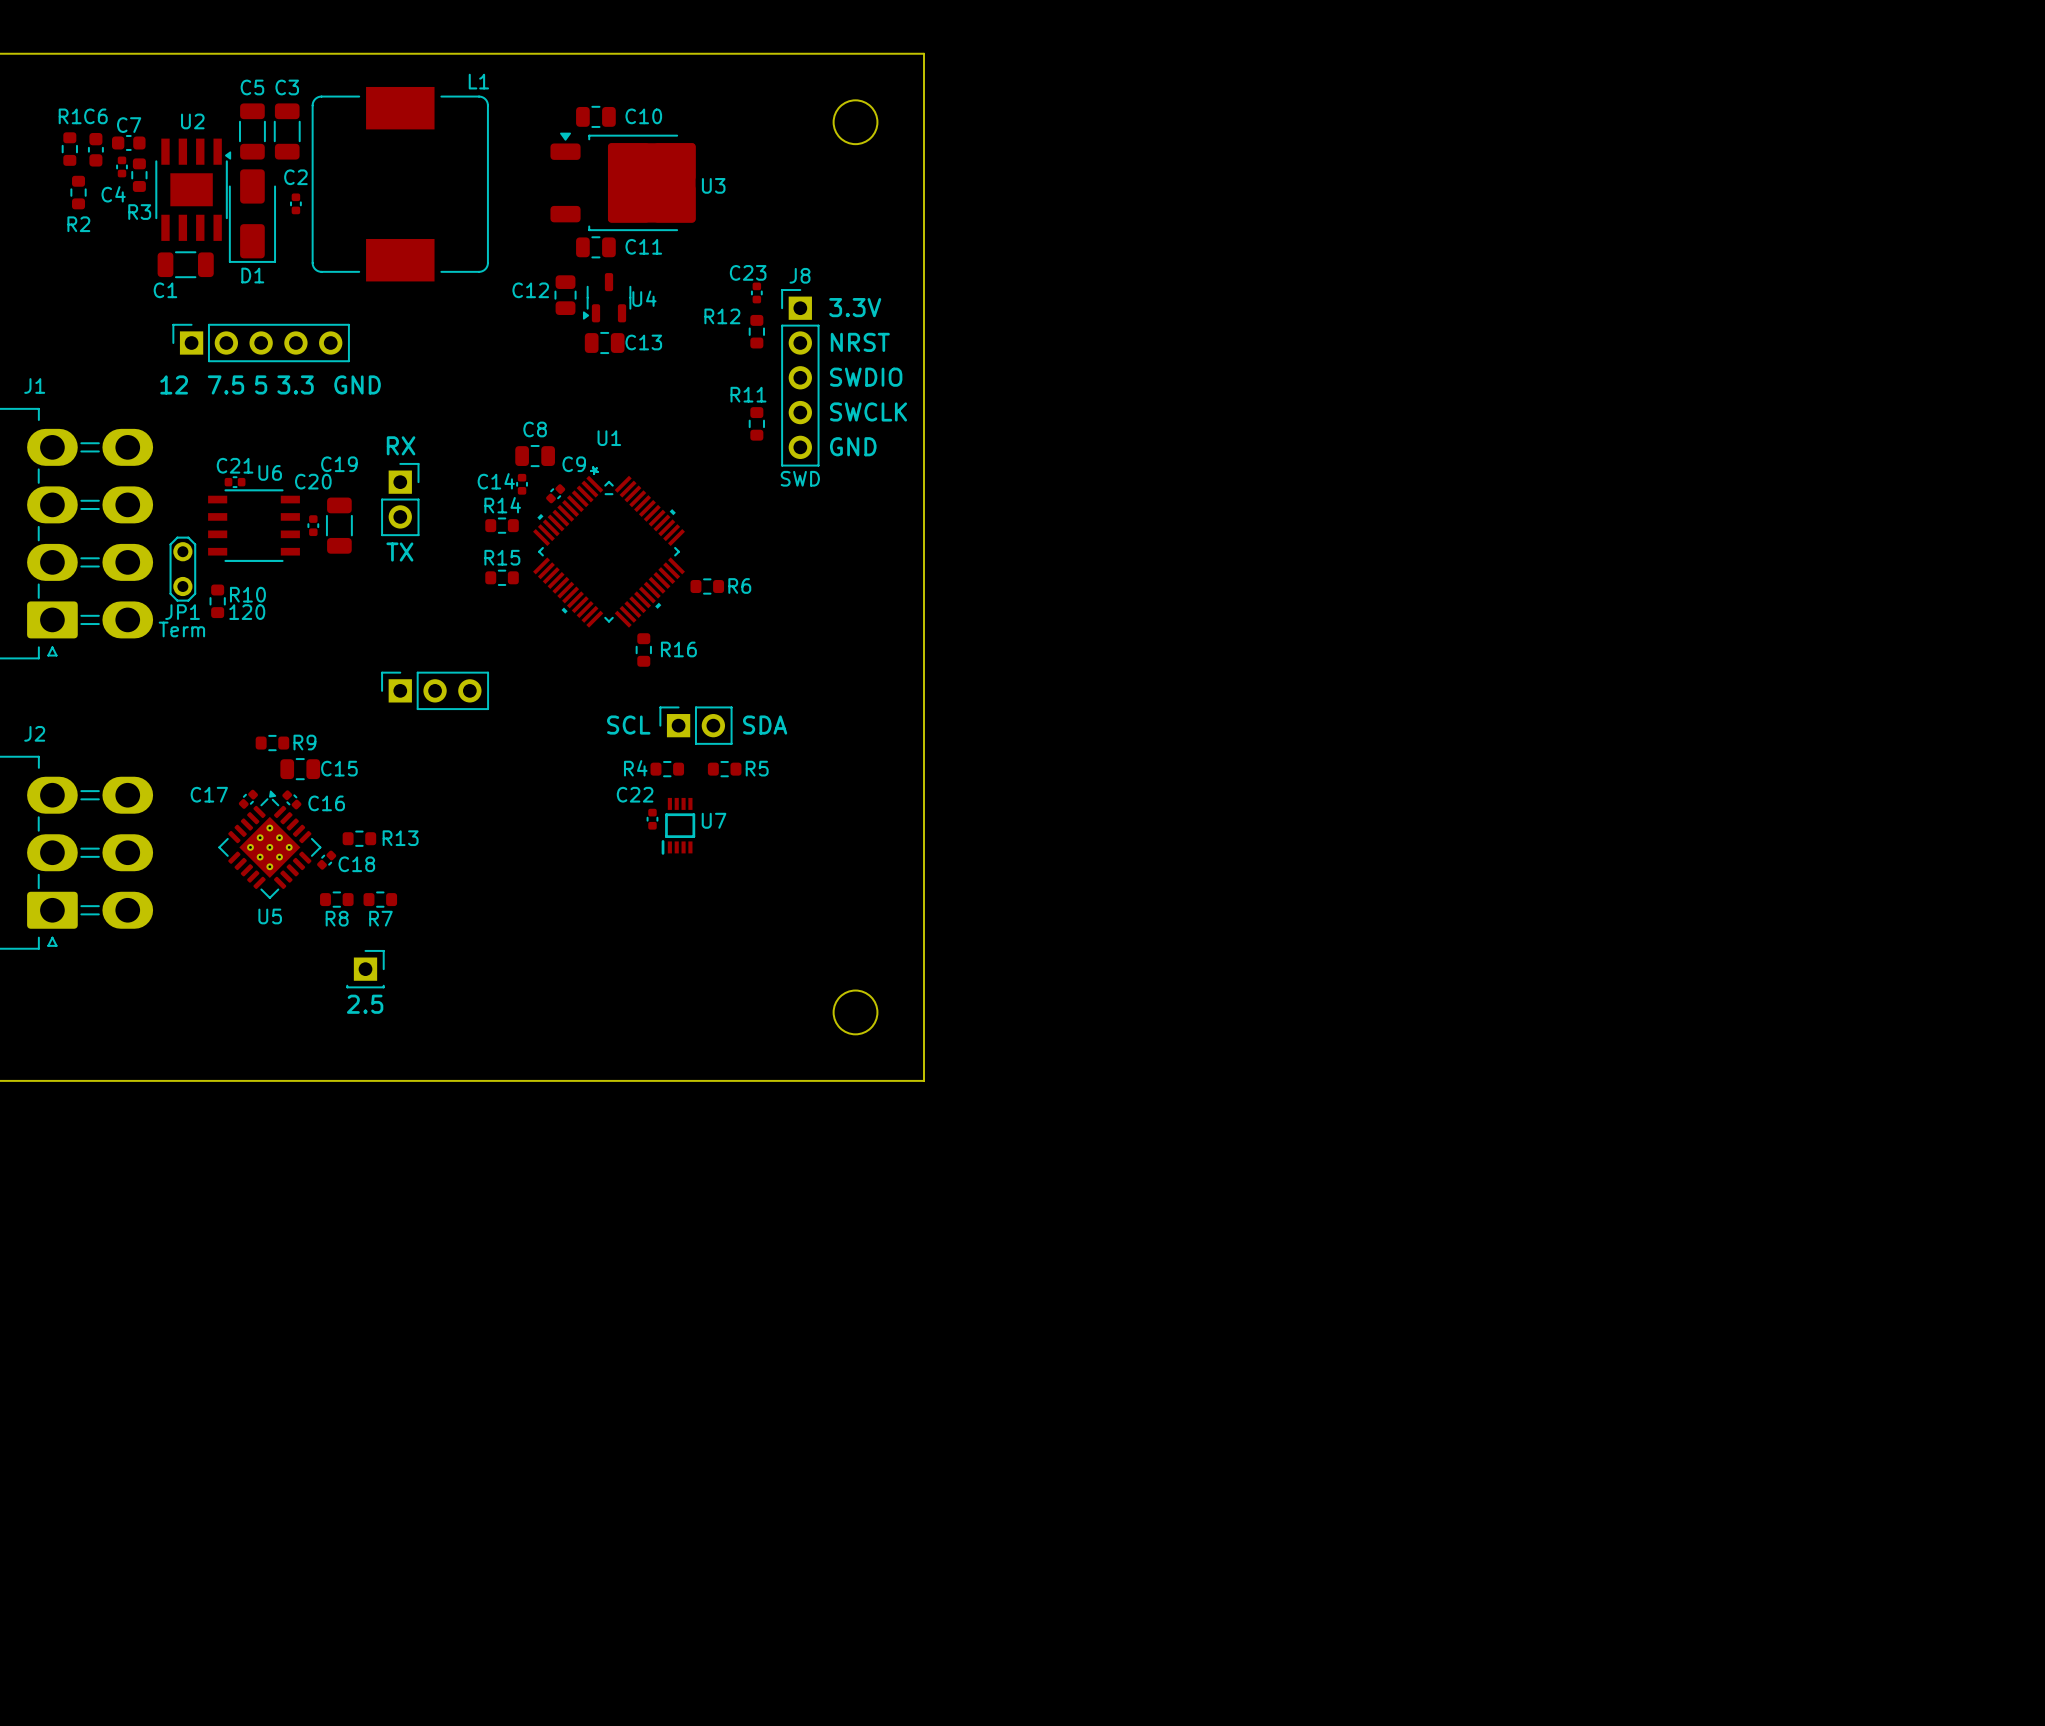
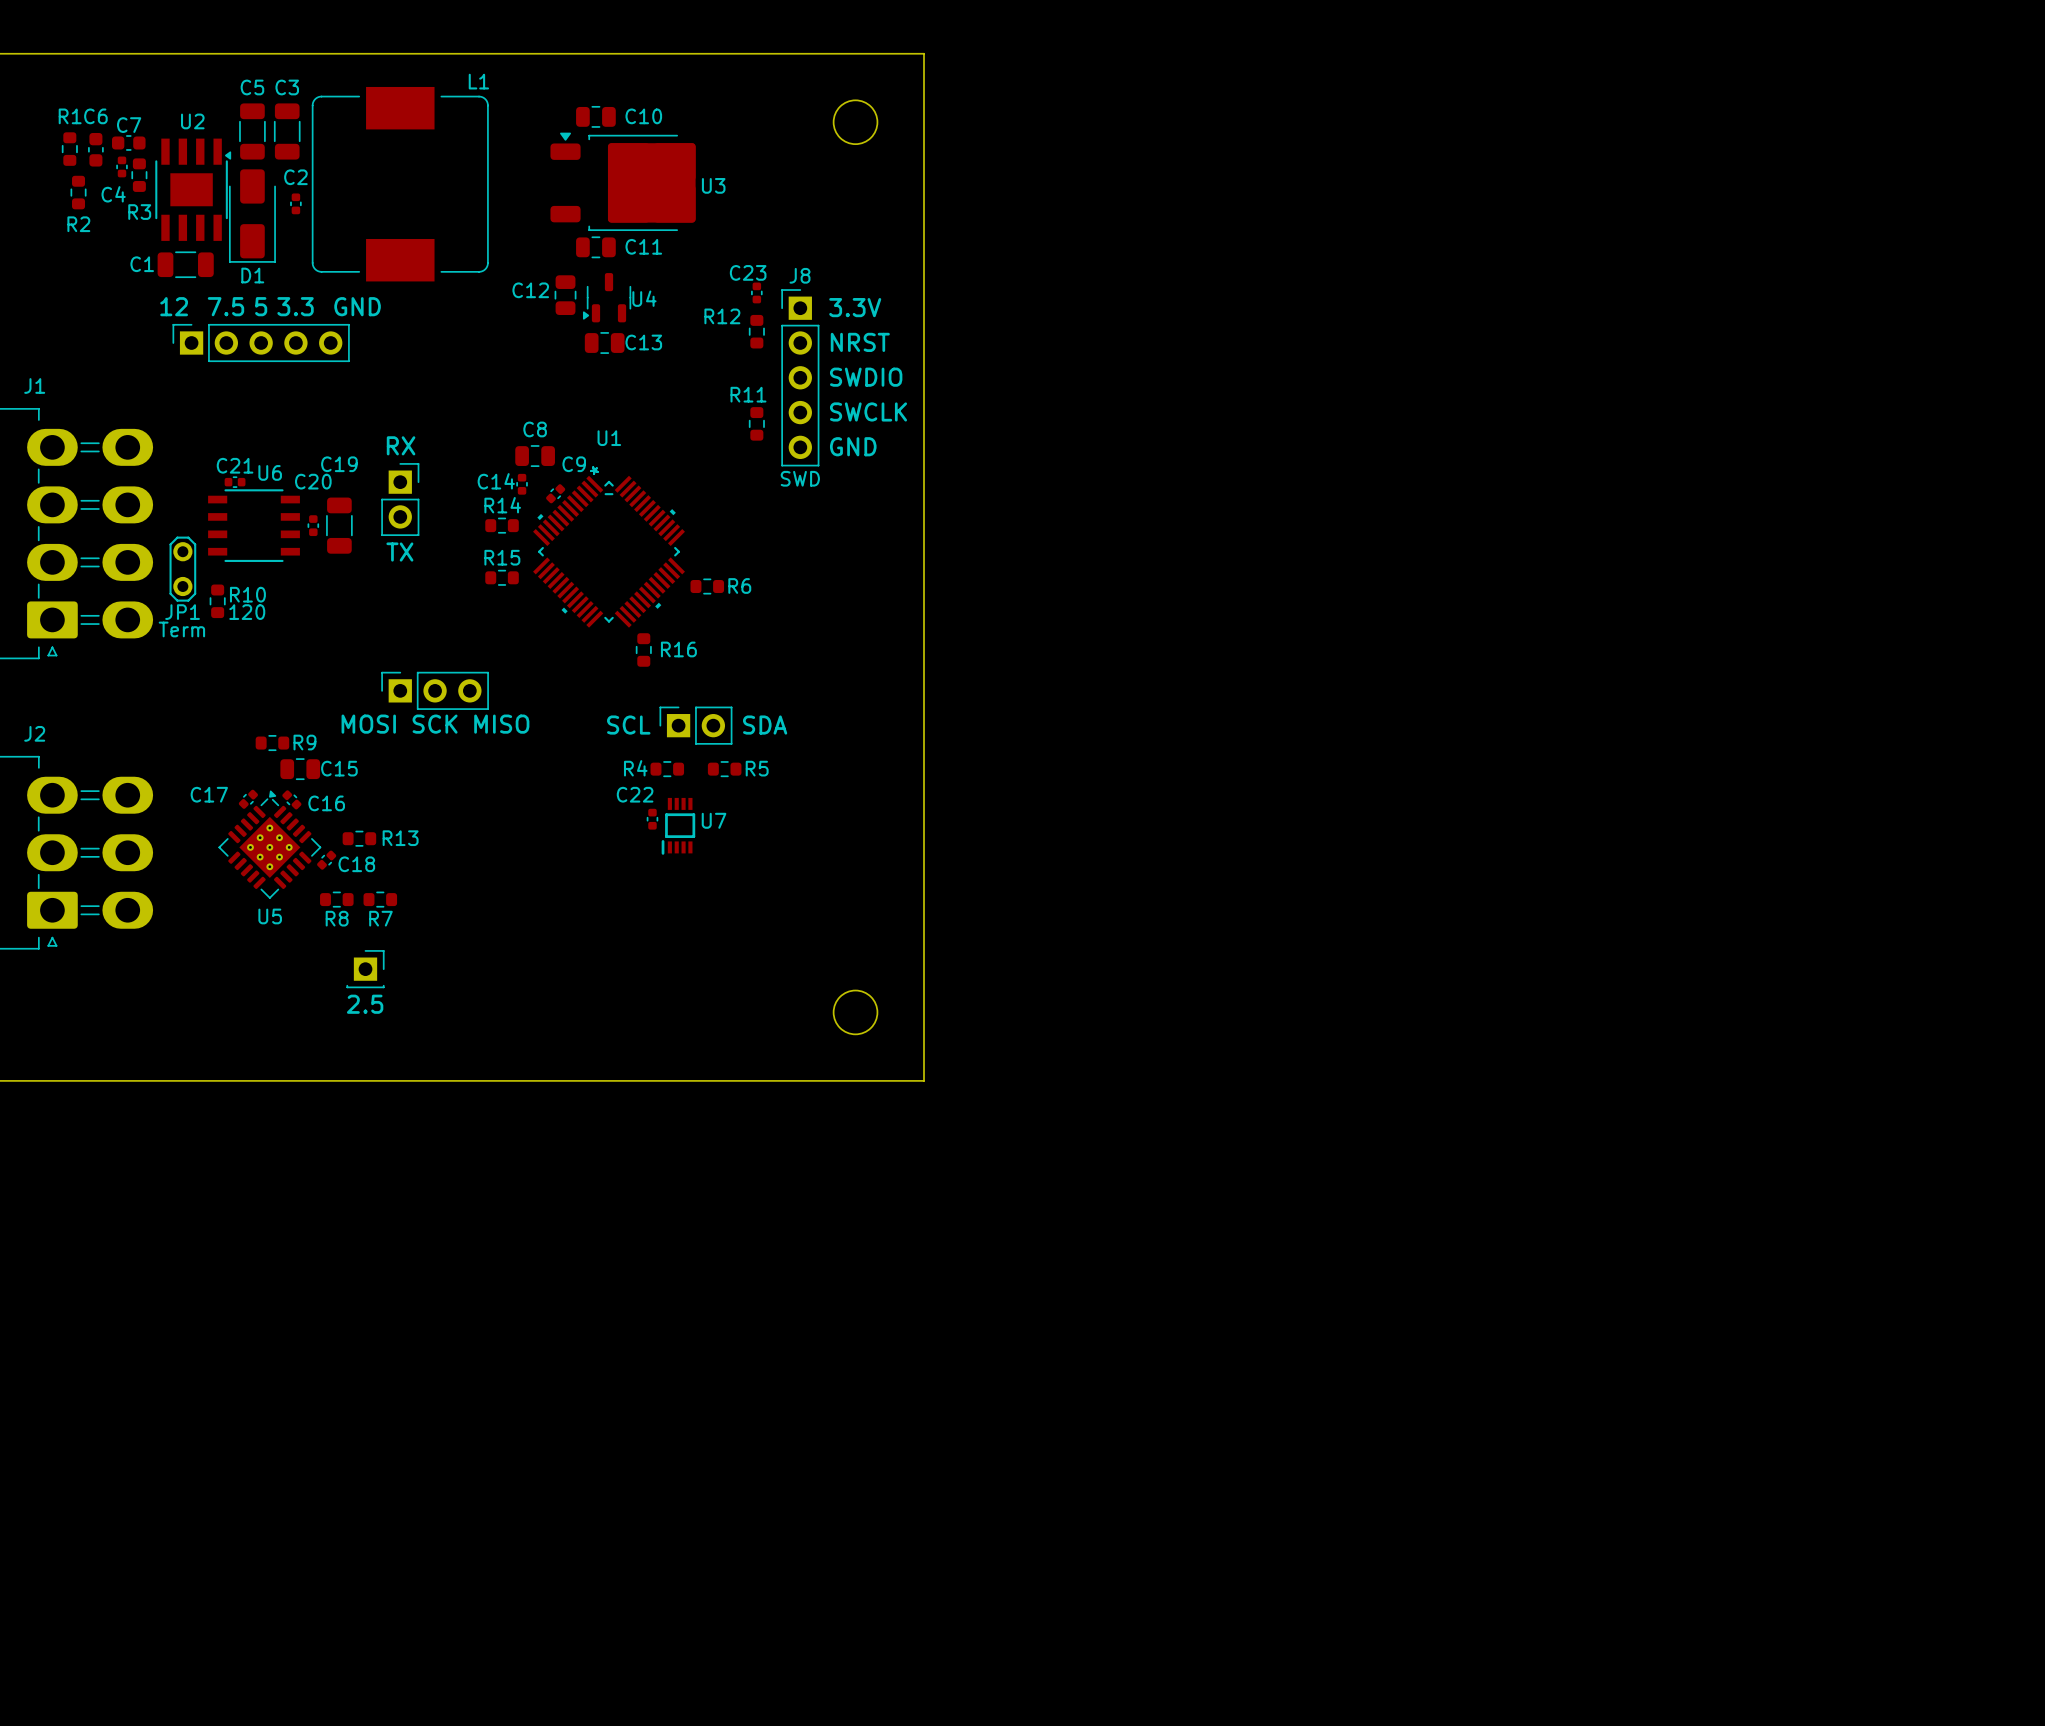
C1 name position: C1 (165, 290) -> C1 (142, 264)
text position: 12 (174, 384) -> 12 (174, 306)
text position: 7.5 (225, 384) -> 7.5 (225, 306)
text position: 5 (261, 384) -> 5 (261, 306)
text position: 3.3 (295, 384) -> 3.3 (295, 306)
text position: GND (357, 384) -> GND (357, 306)
text: none -> MOSI (368, 724)
text: none -> SCK (435, 724)
text: none -> MISO (501, 724)

